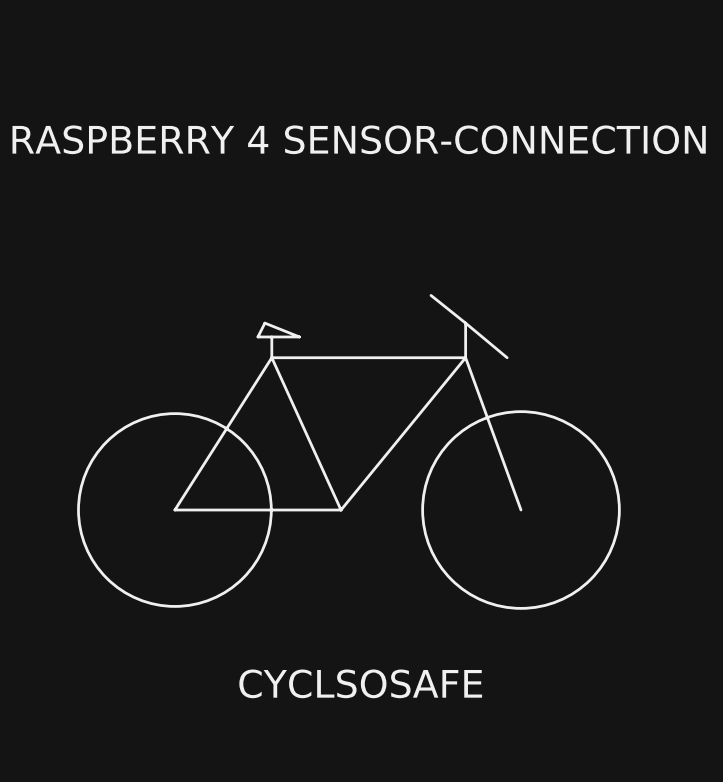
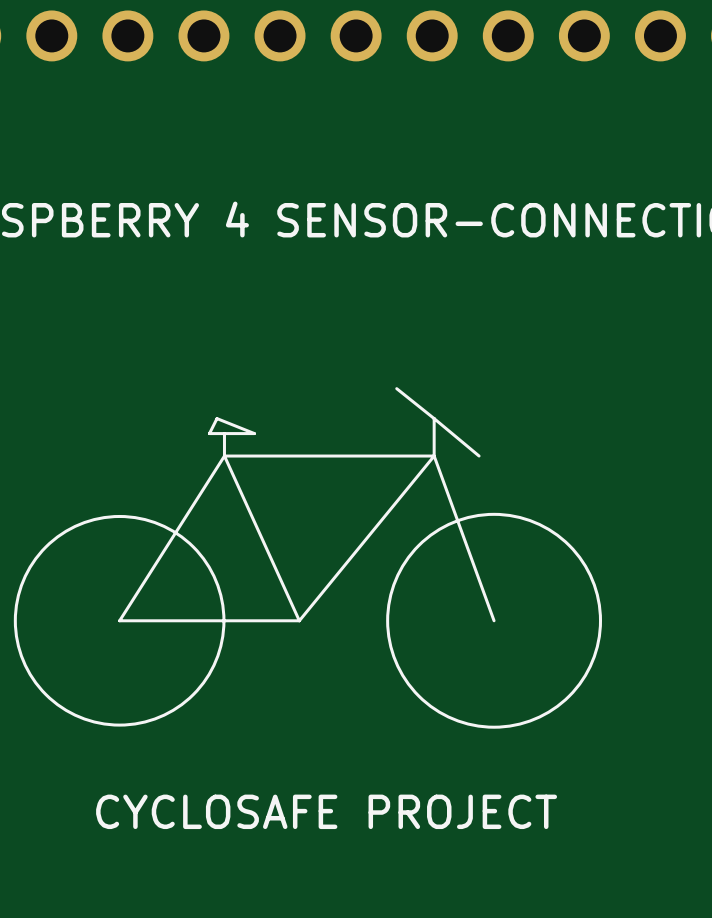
text: CYCLSOSAFE (360, 683) -> CYCLOSAFE PROJECT (326, 811)

